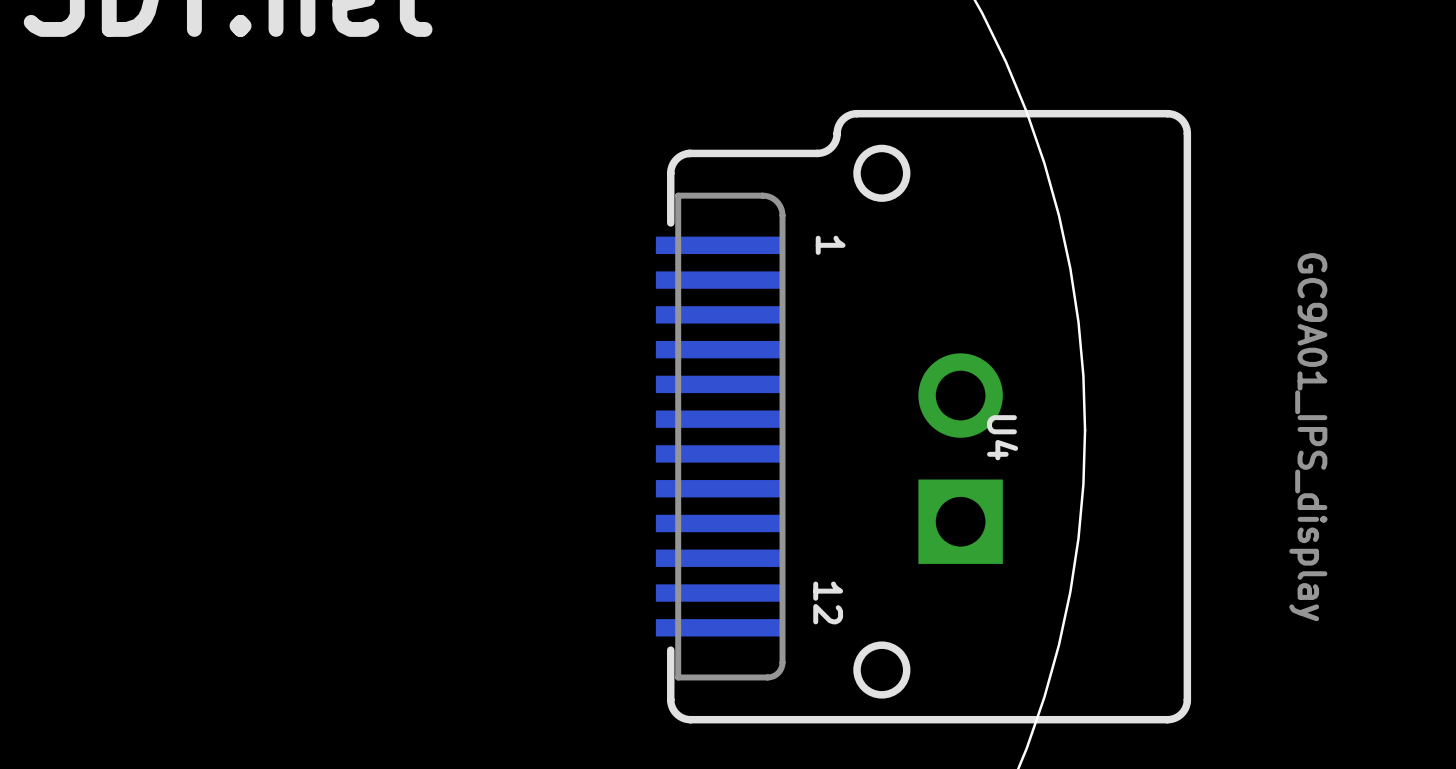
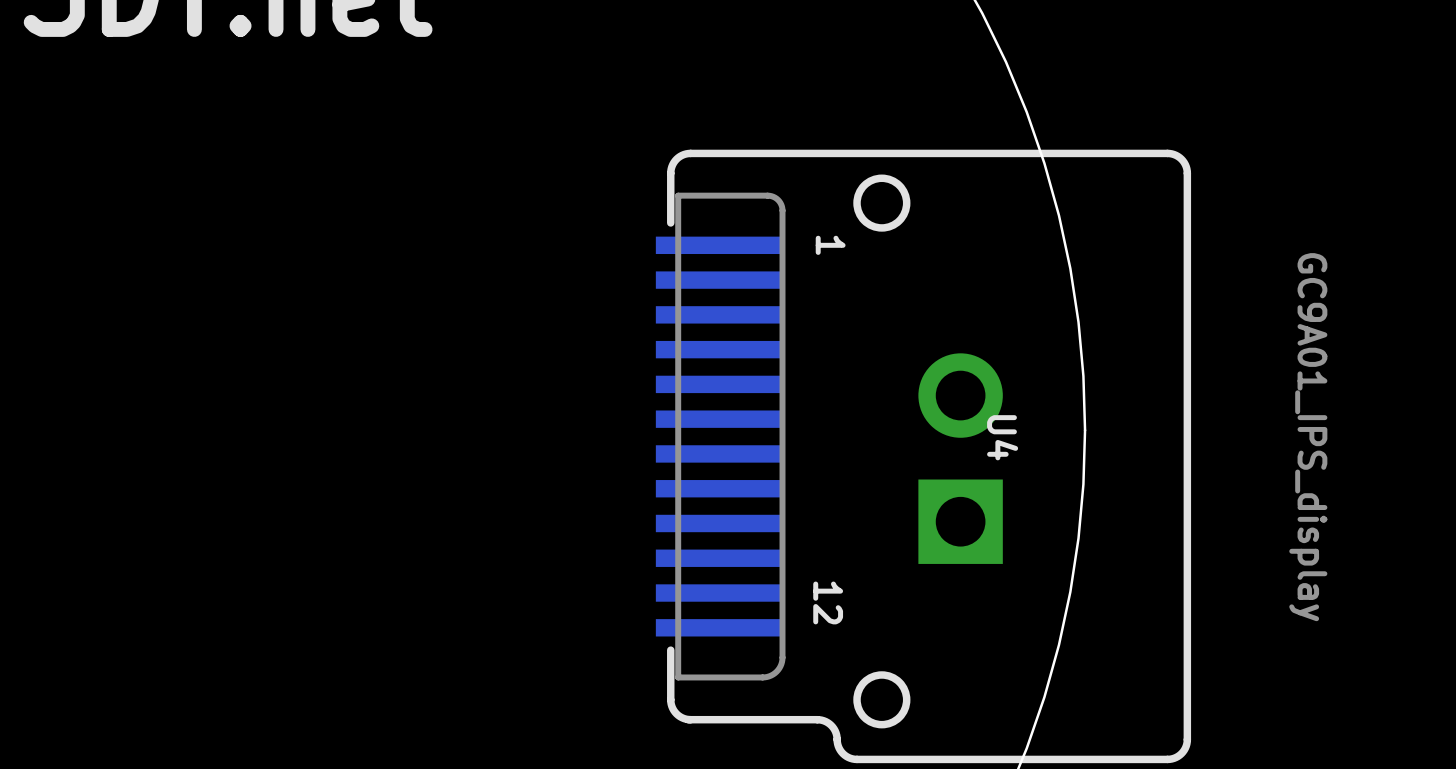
U4 footprint: [655, 109, 1192, 724] -> [655, 149, 1192, 764]

